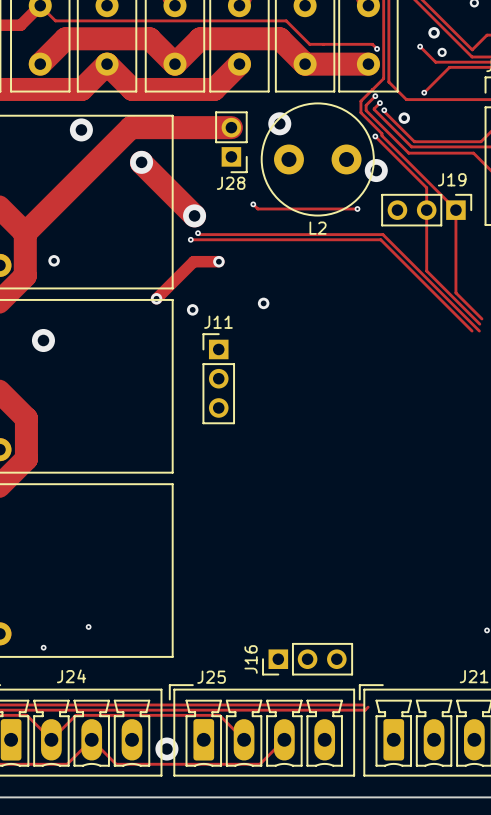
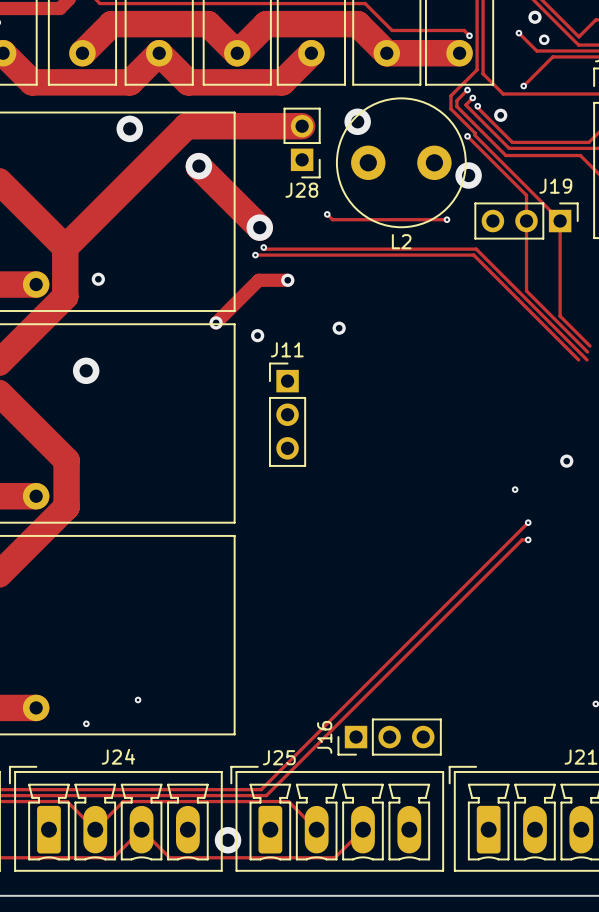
via: none -> (566, 461)
via: none -> (515, 489)
via: none -> (528, 522)
via: none -> (528, 539)
track: (195, 704) (362, 704) -> (261, 789) (528, 522)
track: (368, 707) (365, 710) (200, 710) -> (528, 539) (522, 539) (266, 795)

